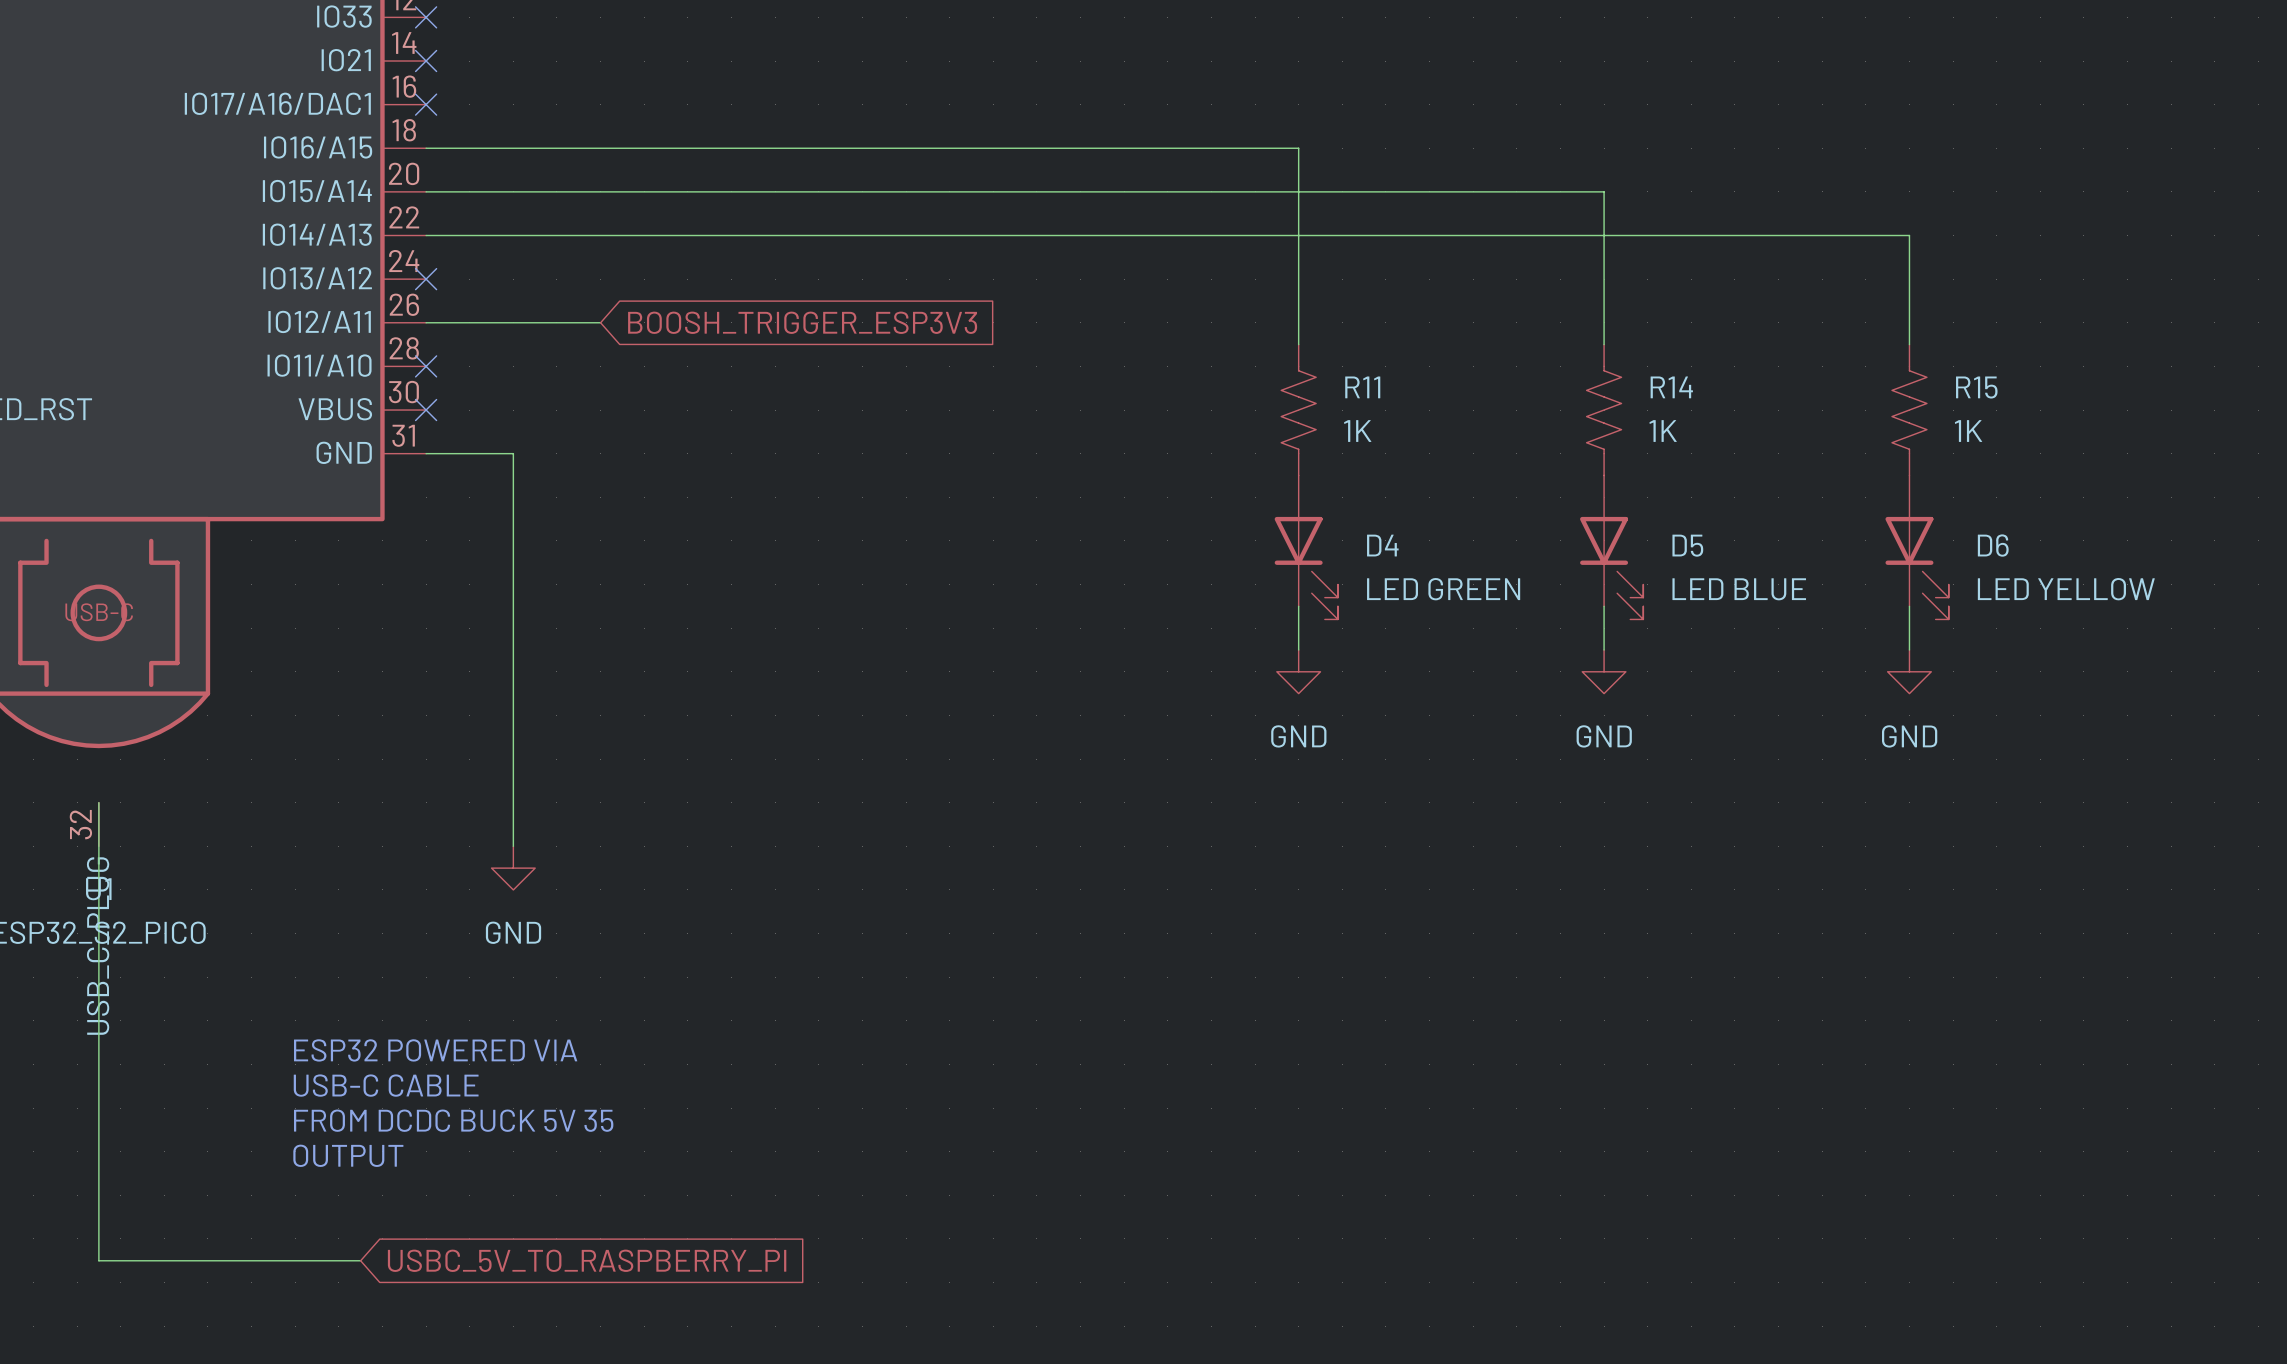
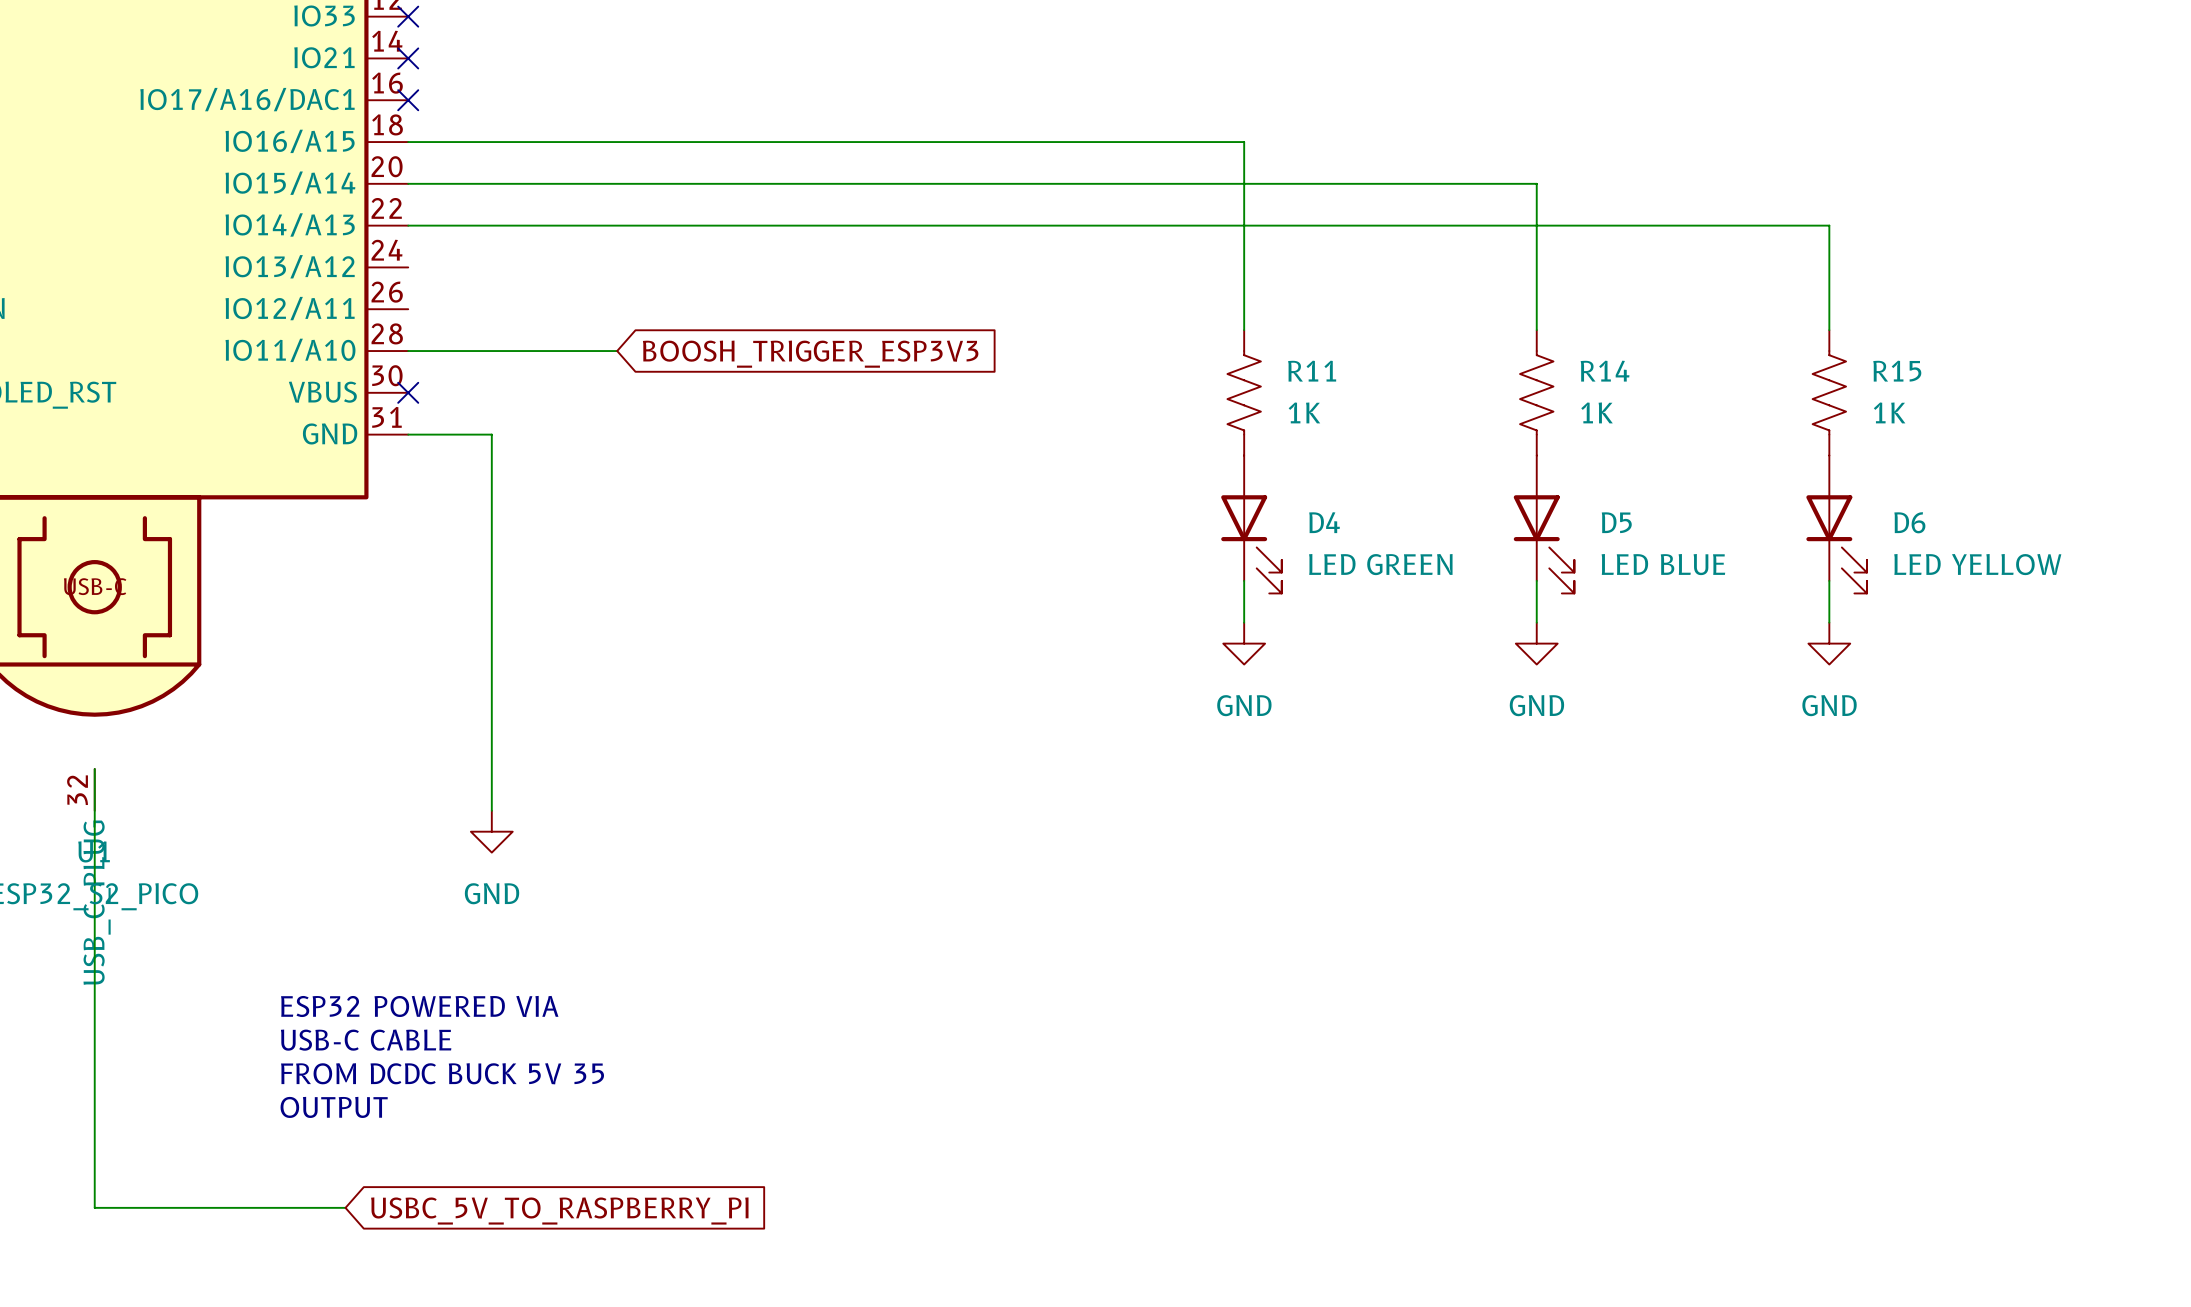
no-connect mark: (426, 279) -> none
wire: (426, 322) (600, 322) -> none
global label position: BOOSH_TRIGGER_ESP3V3 (802, 322) -> BOOSH_TRIGGER_ESP3V3 (810, 354)
wire: none -> (408, 351) (617, 351)
no-connect mark: (426, 366) -> none

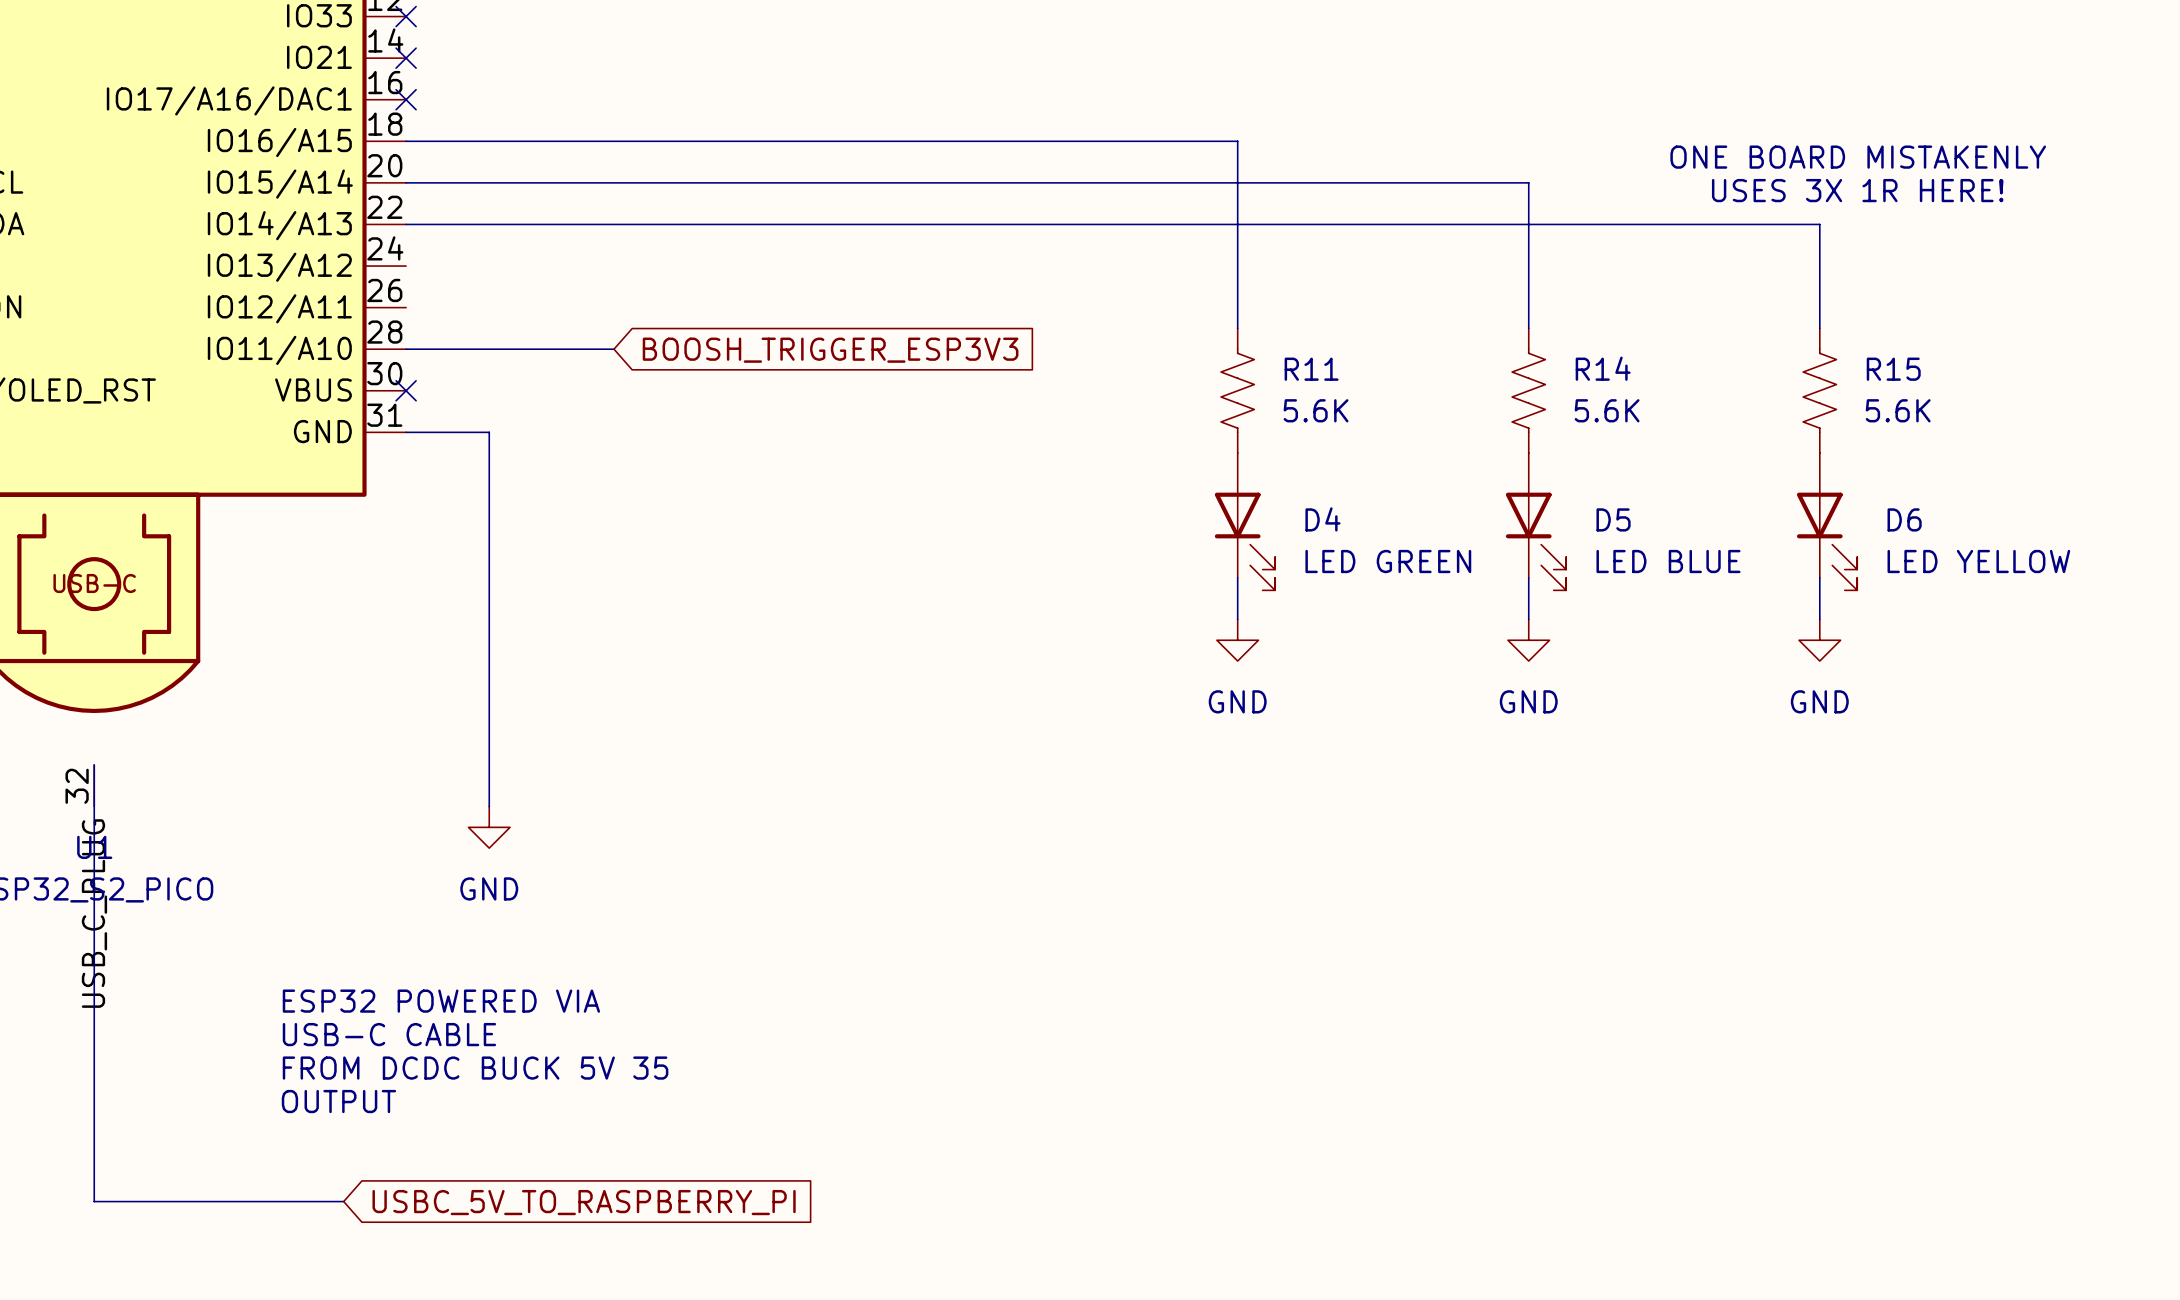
text: none -> ONE BOARD MISTAKENLY (1858, 157)
text: none -> USES 3X 1R HERE! (1857, 190)
R11 value: 1K (1304, 412) -> 5.6K (1316, 410)
R14 value: 1K (1597, 412) -> 5.6K (1607, 410)
R15 value: 1K (1889, 412) -> 5.6K (1898, 410)

